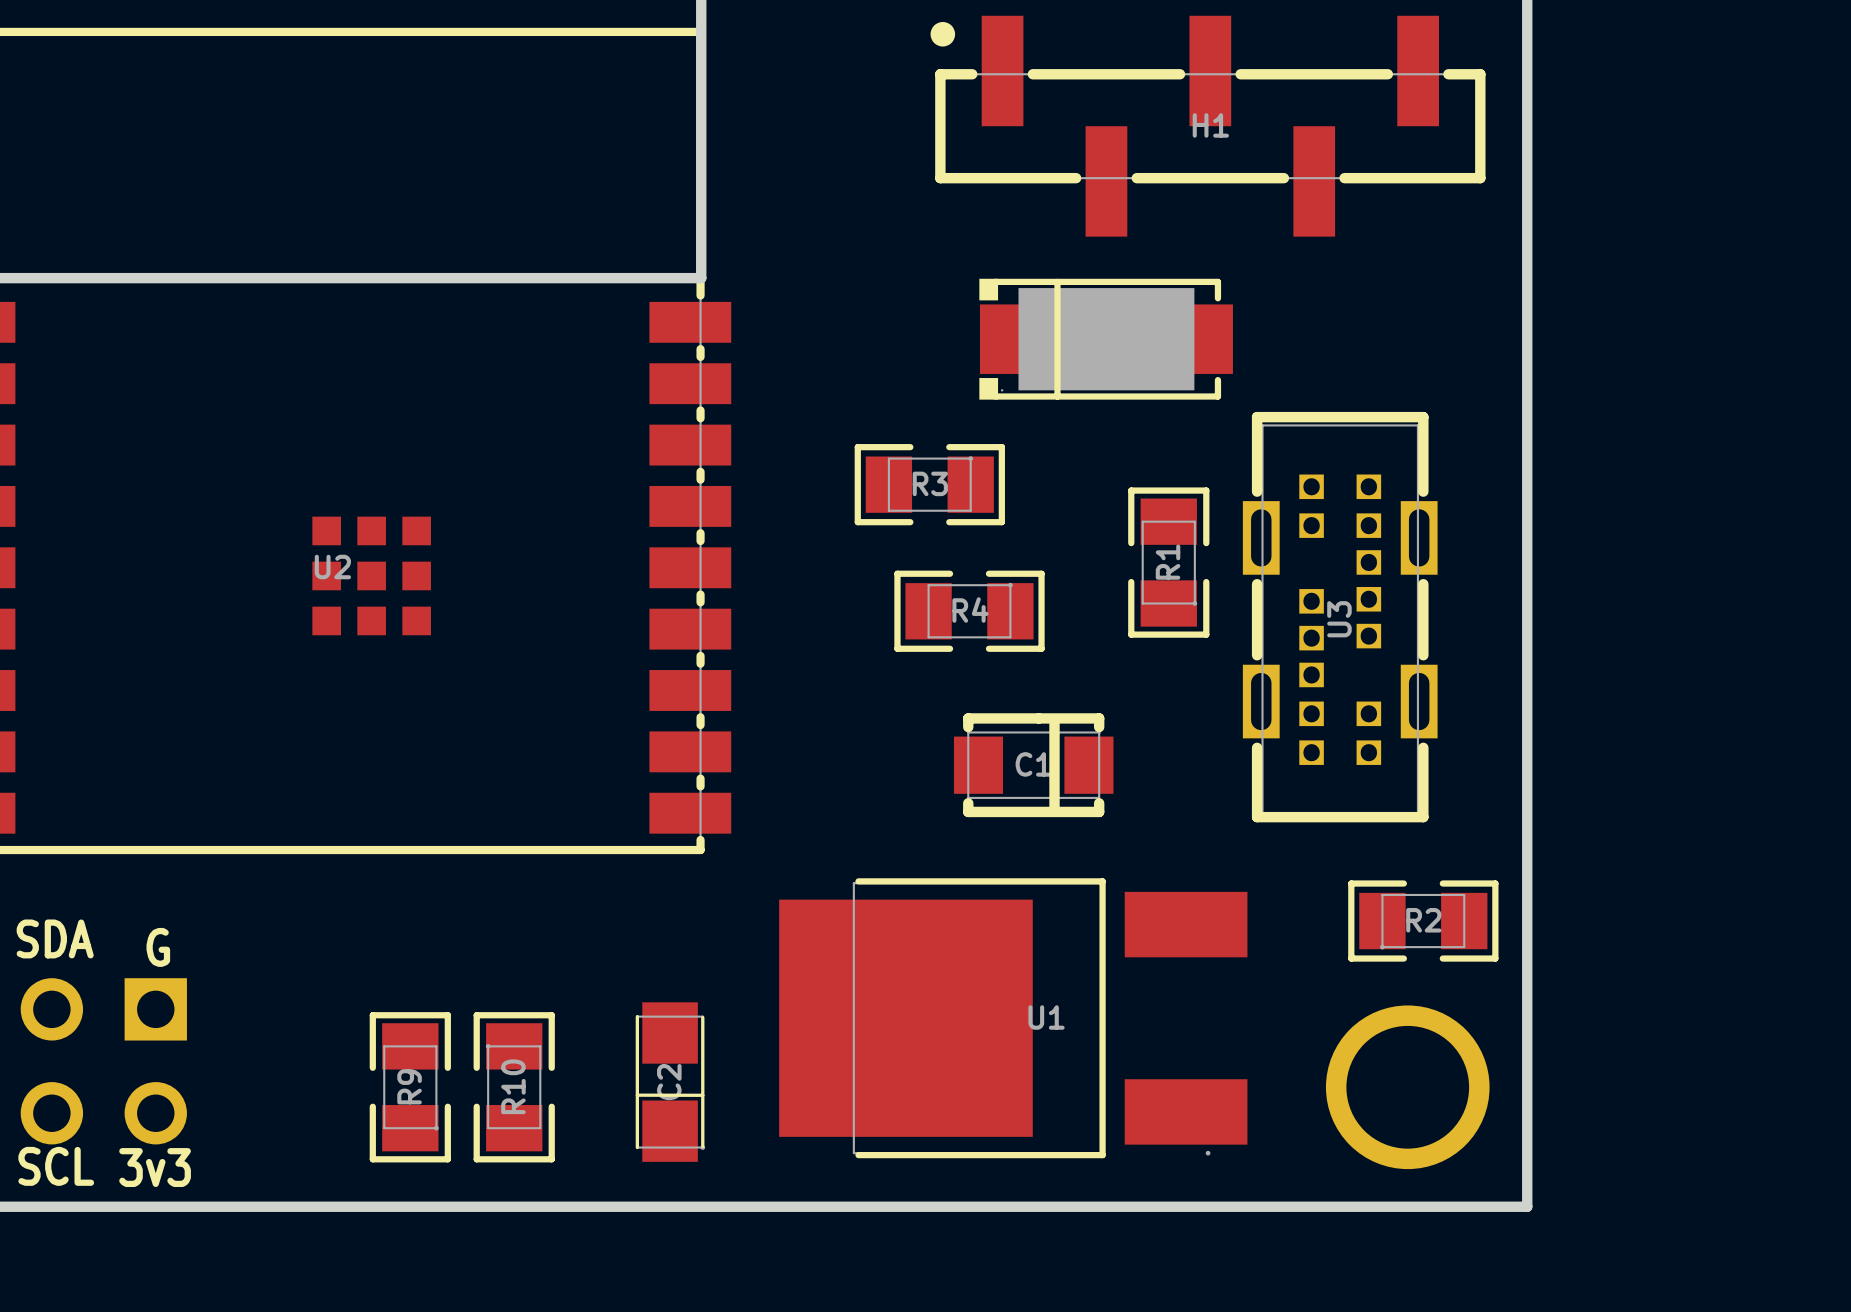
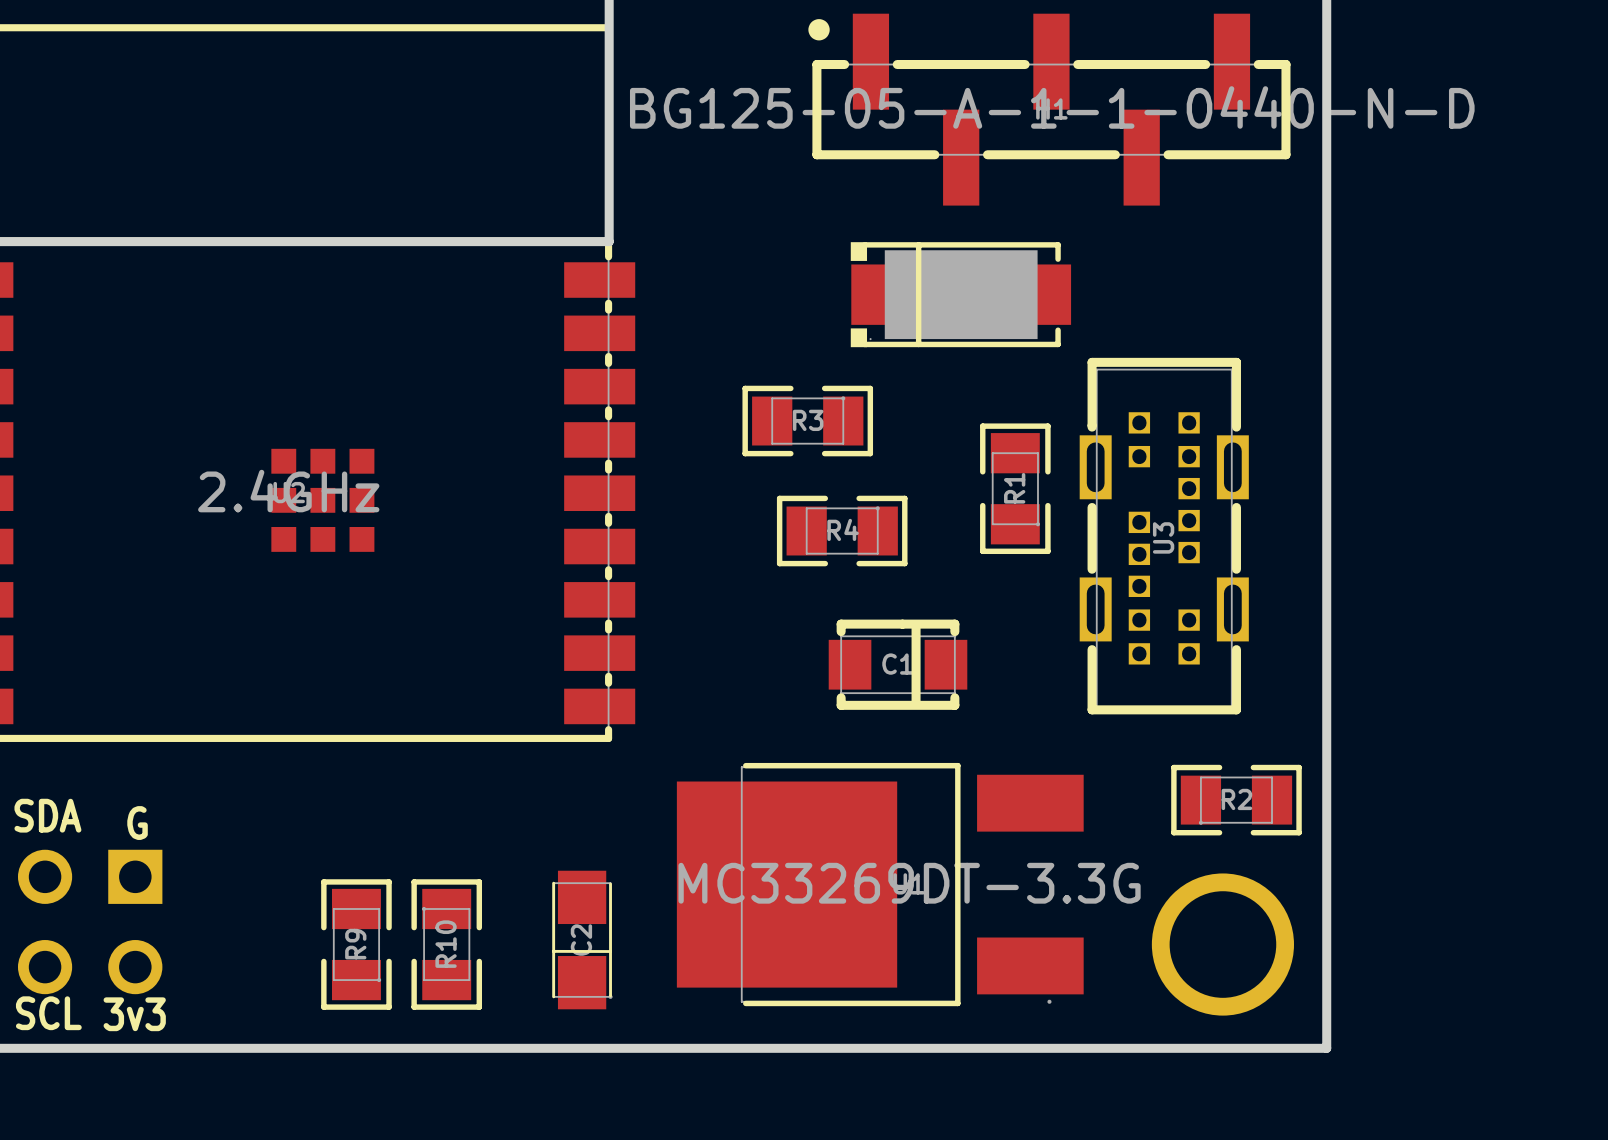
H1 value: none -> BG125-05-A-1-1-0440-N-D (1052, 107)
U2 value: none -> 2.4GHz (288, 491)
U1 value: none -> MC33269DT-3.3G (909, 883)

